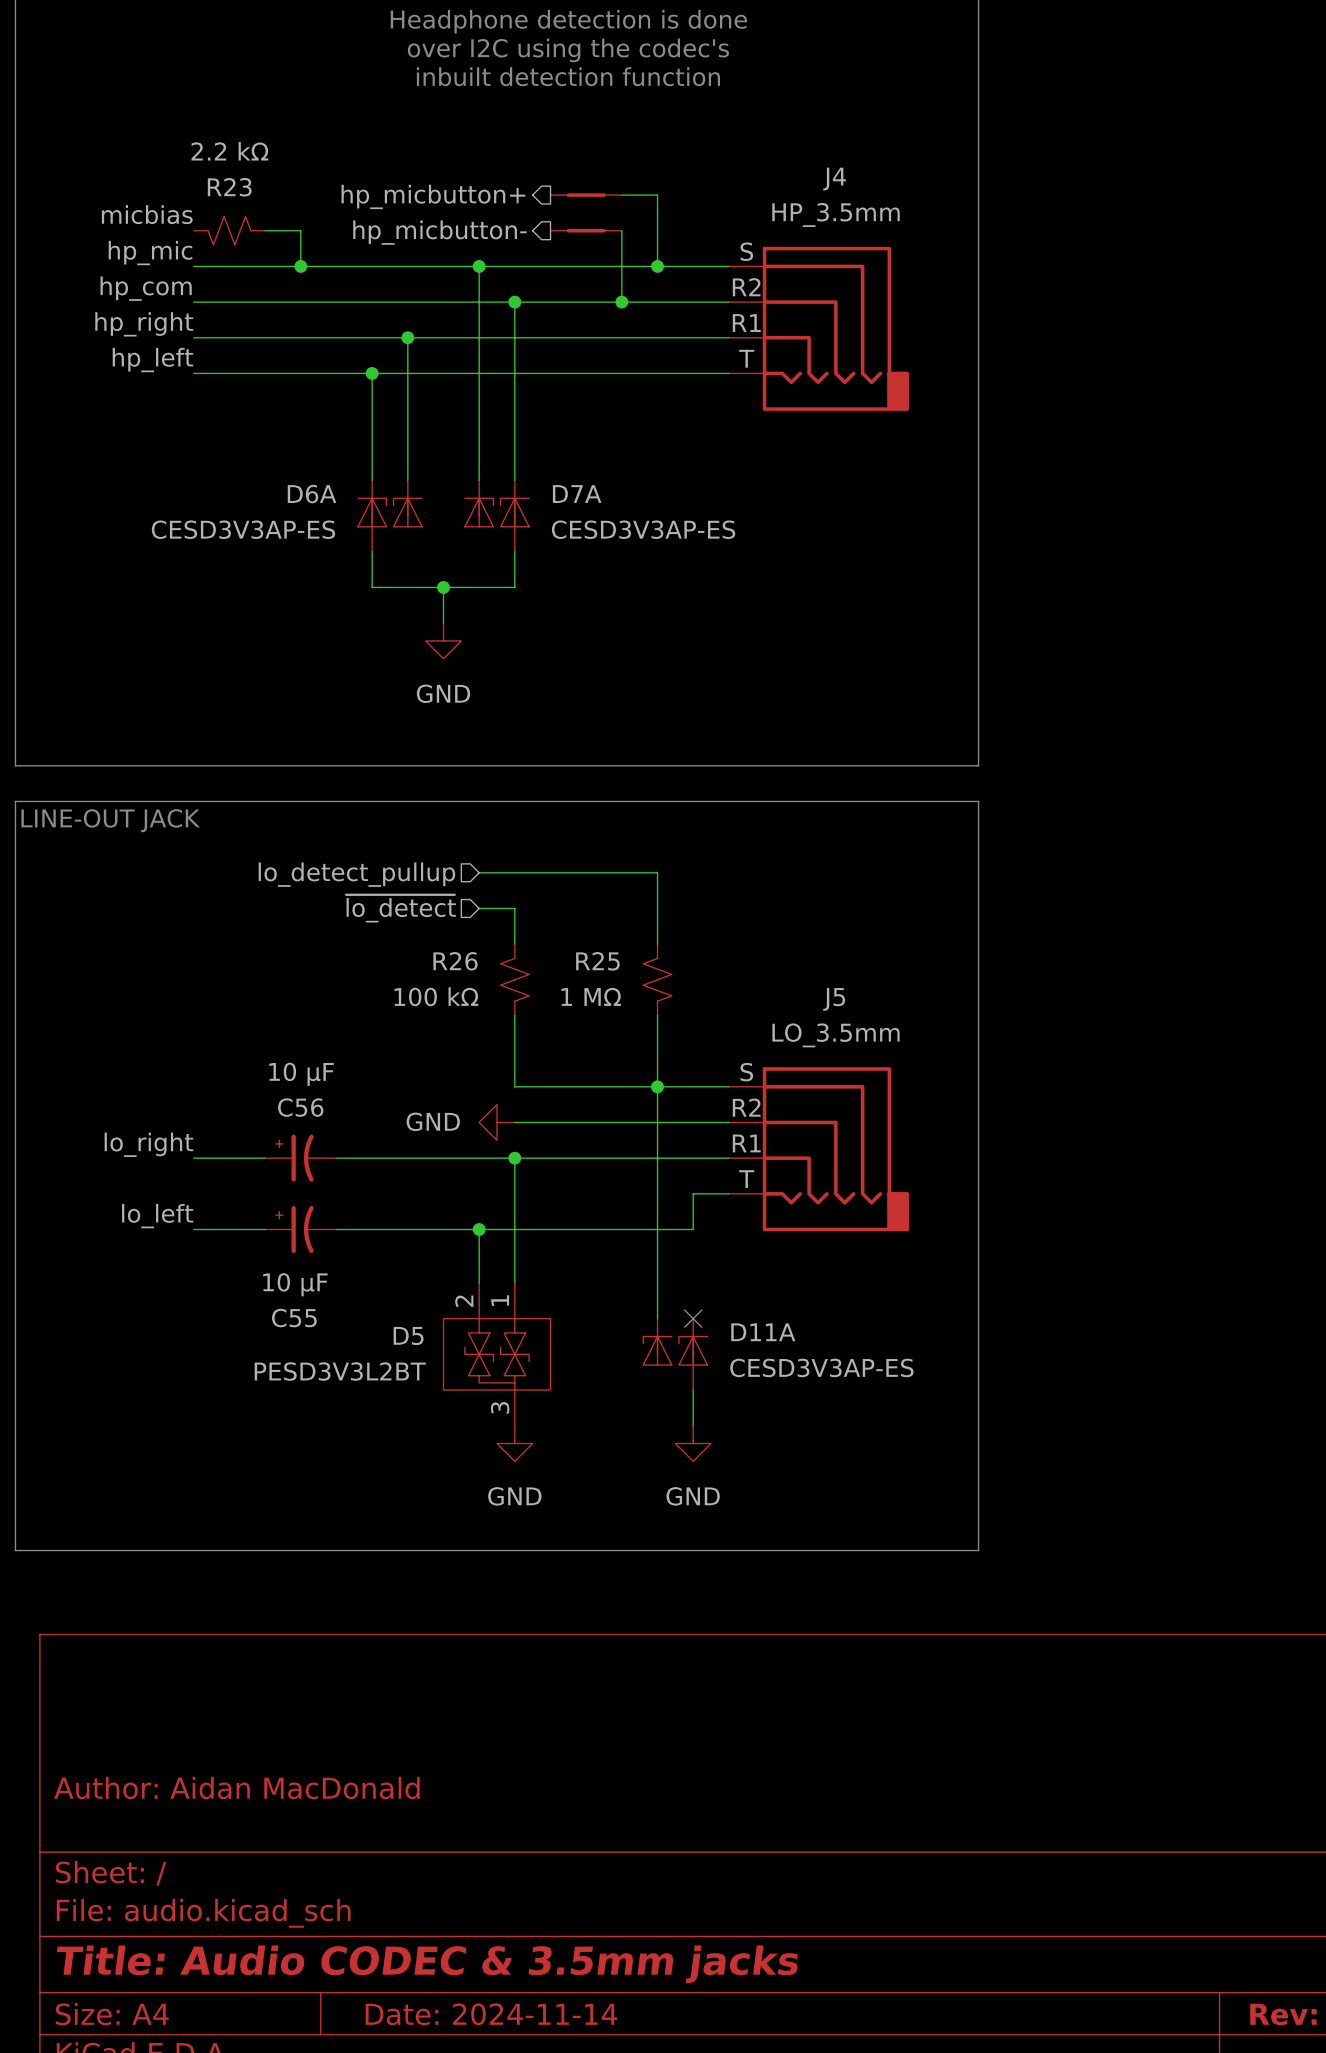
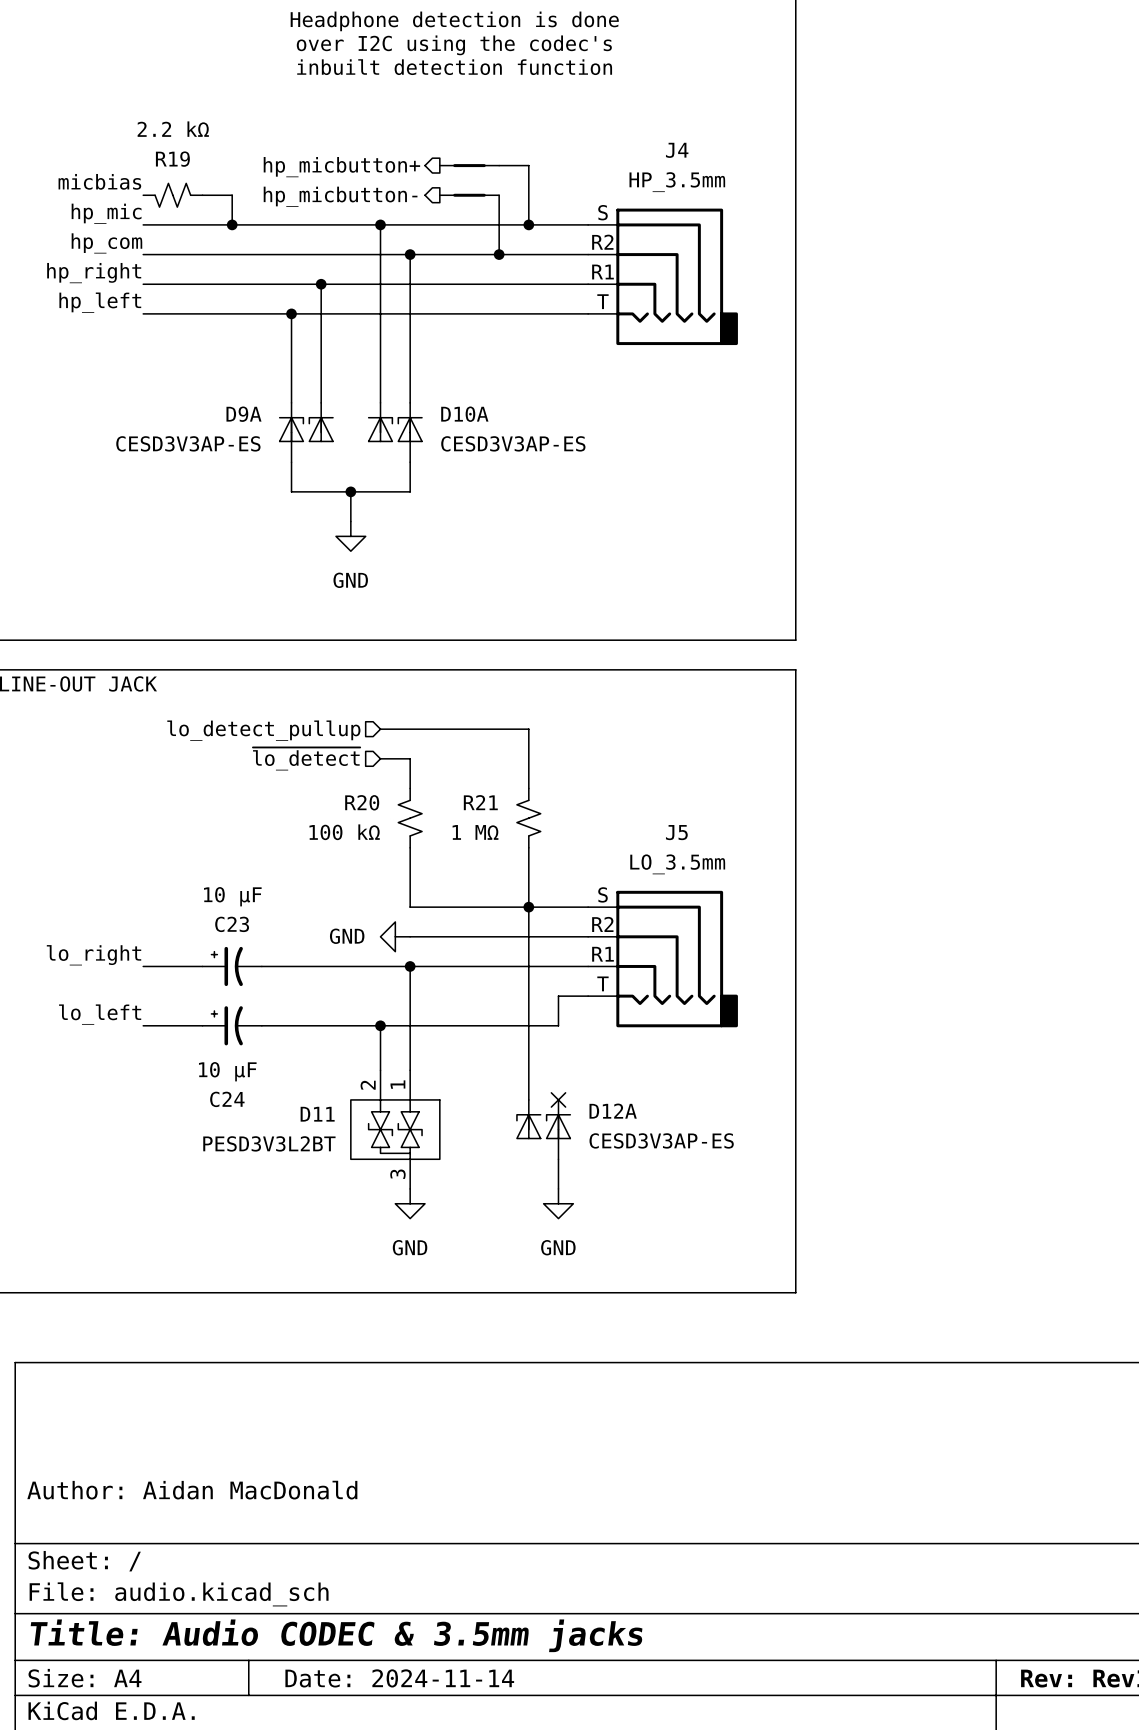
R23 name: R23 (229, 187) -> R19 (172, 159)
D6A name: D6A (312, 494) -> D9A (243, 414)
D7A name: D7A (577, 494) -> D10A (464, 414)
R26 name: R26 (455, 961) -> R20 (362, 802)
R25 name: R25 (597, 961) -> R21 (480, 802)
C56 name: C56 (300, 1107) -> C23 (232, 924)
C55 name: C55 (294, 1318) -> C24 (227, 1099)
D11A name: D11A (763, 1332) -> D12A (613, 1111)
D5 name: D5 (408, 1336) -> D11 (317, 1114)

